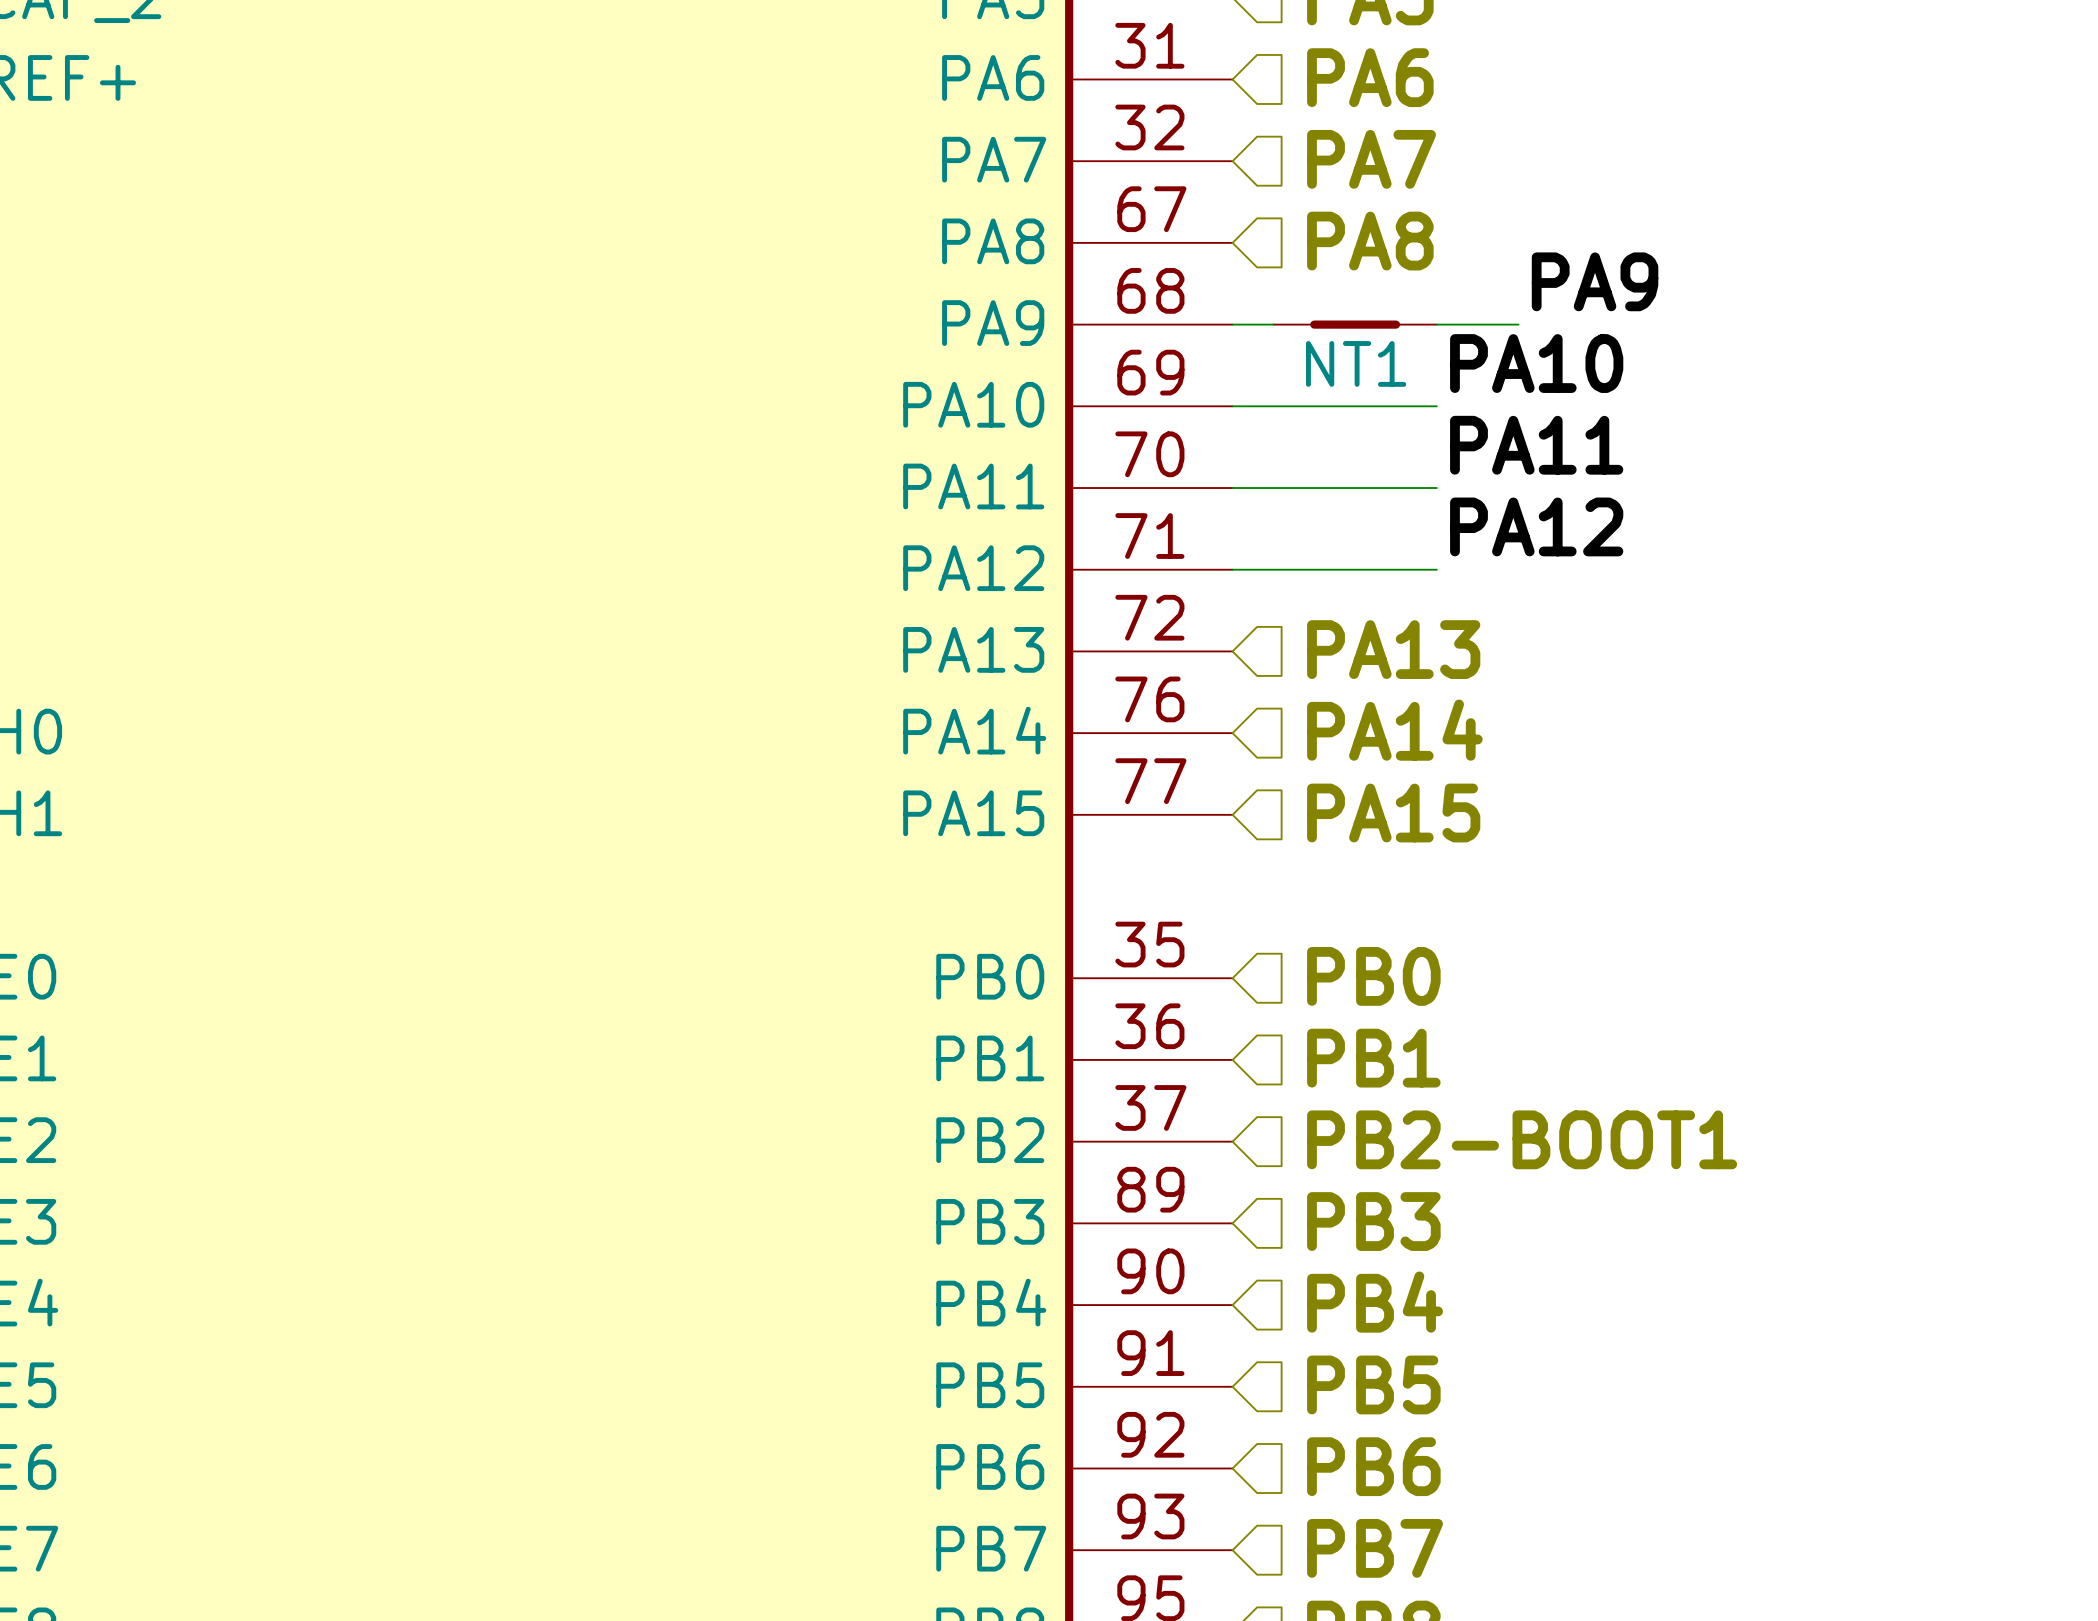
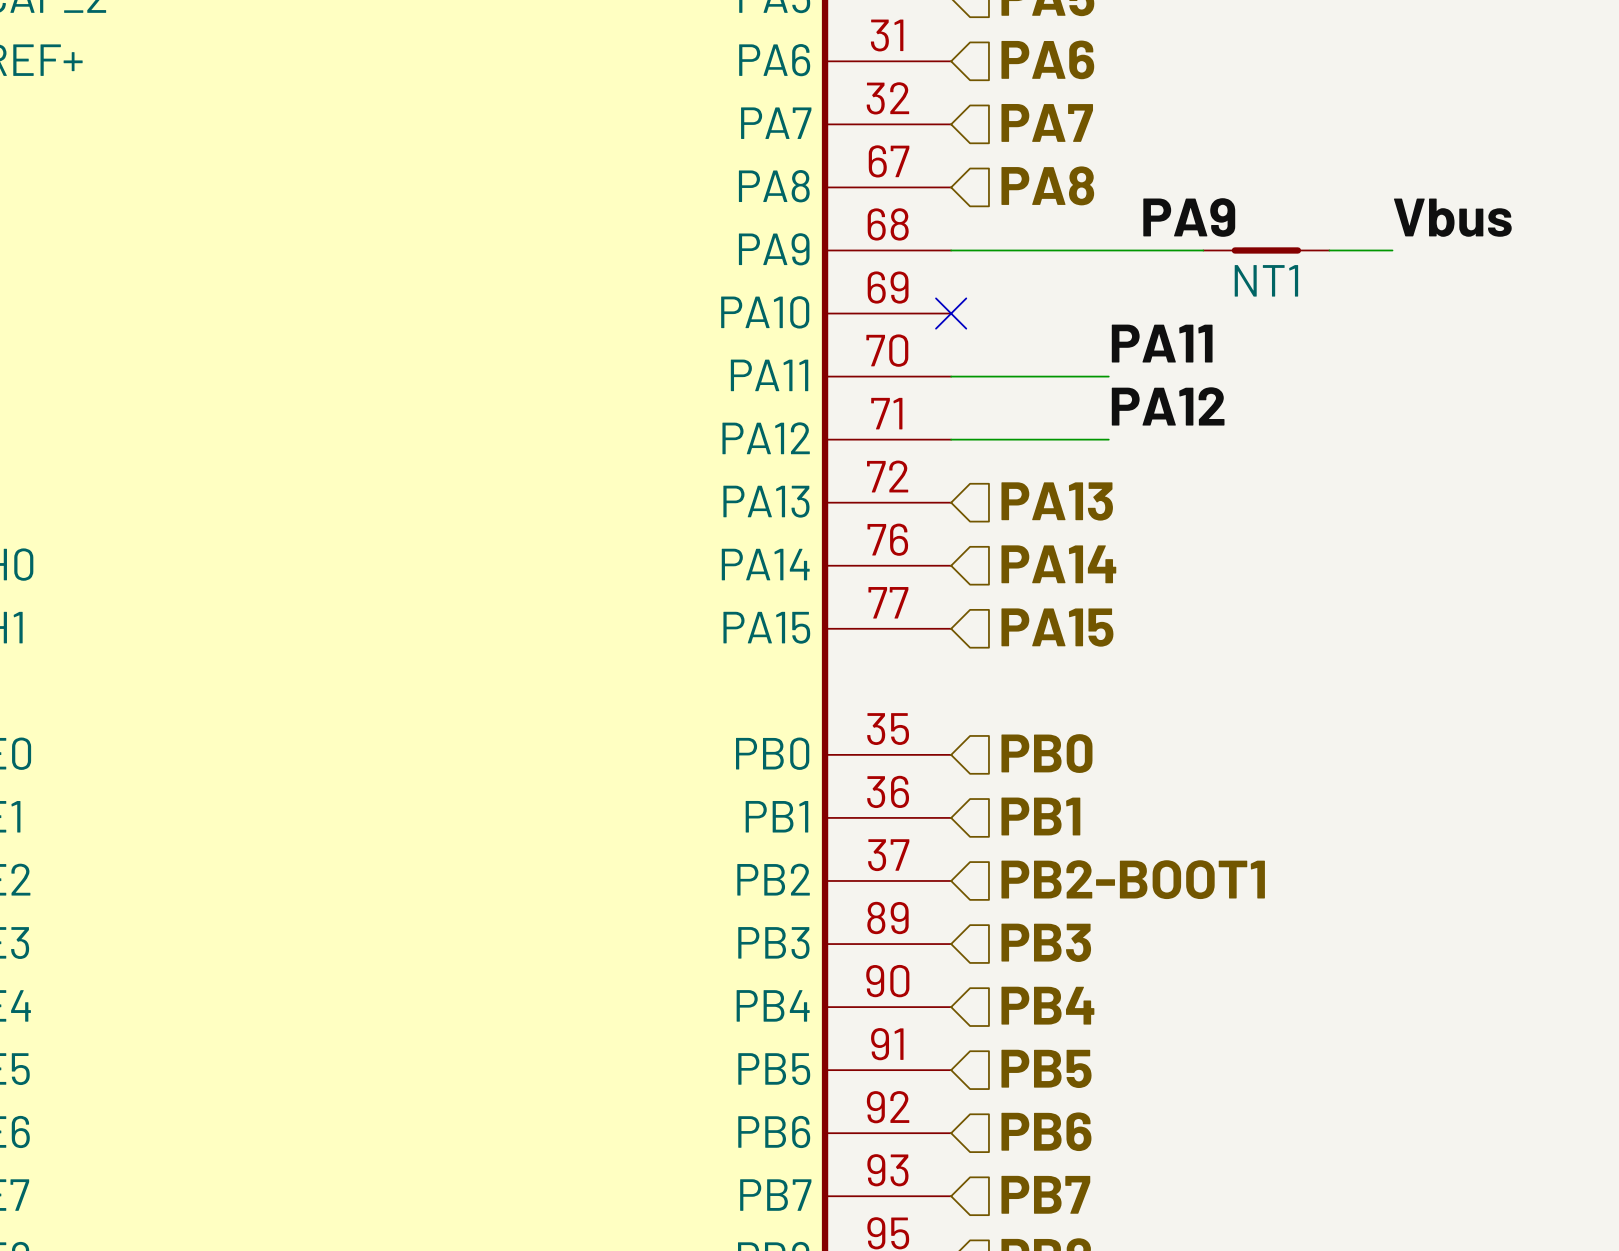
label position: PA9 (1595, 281) -> PA9 (1189, 217)
label: none -> Vbus (1452, 217)
NT1 position: (1355, 324) -> (1266, 250)
wire: none -> (1171, 250) (1203, 250)
wire: none -> (1329, 250) (1392, 250)
label: PA10 (1536, 363) -> none
wire: (1232, 406) (1436, 406) -> none
no-connect mark: none -> (951, 313)

